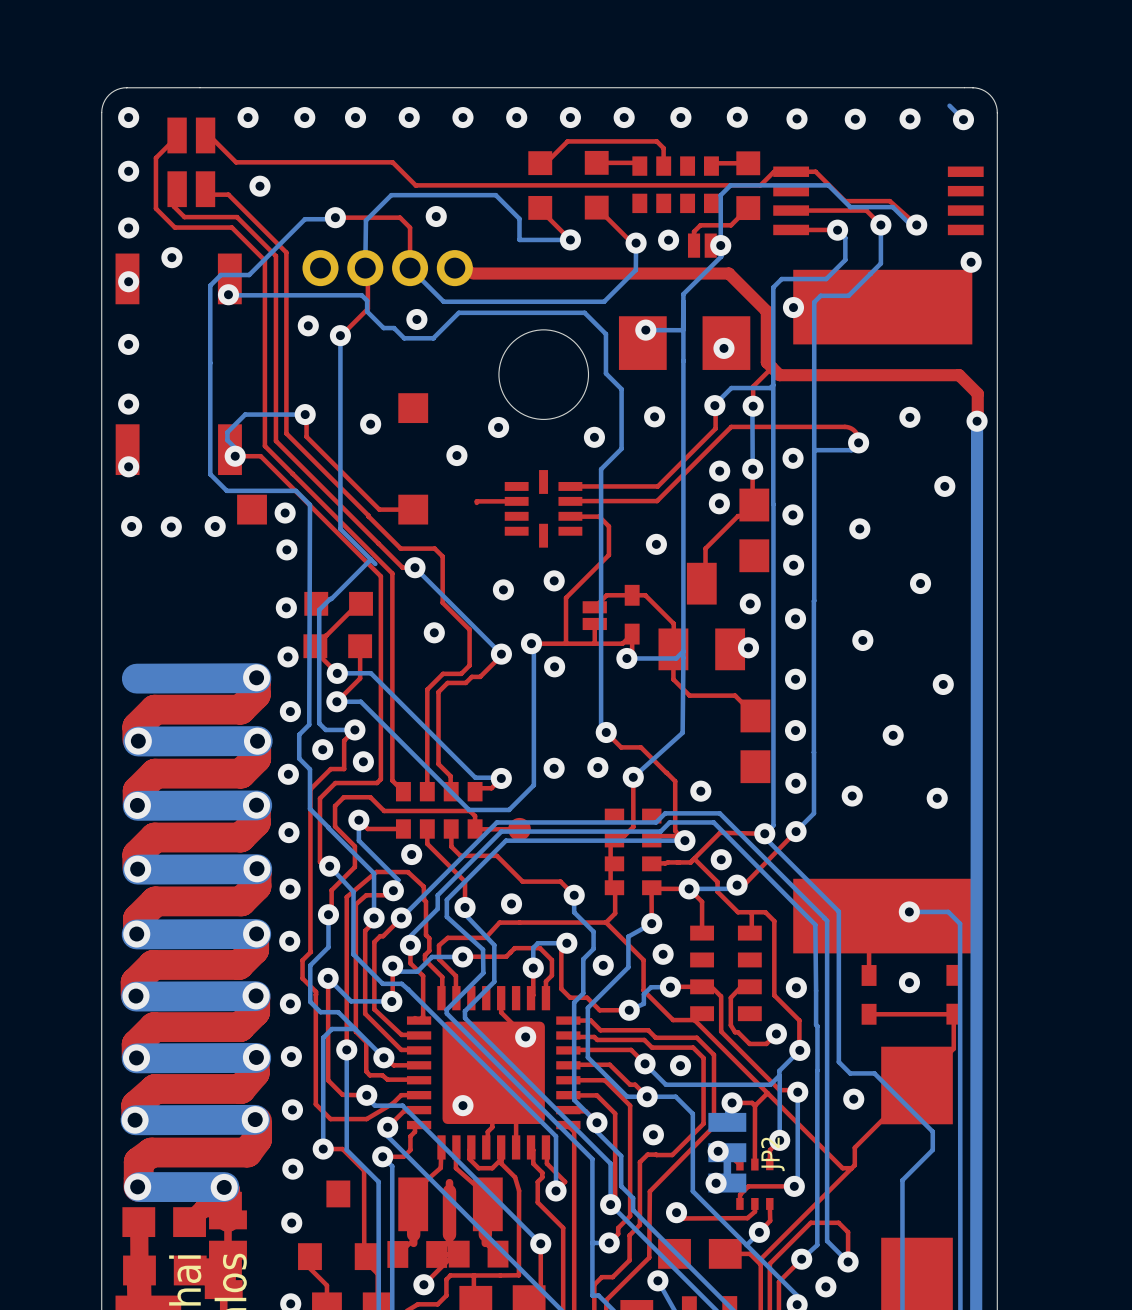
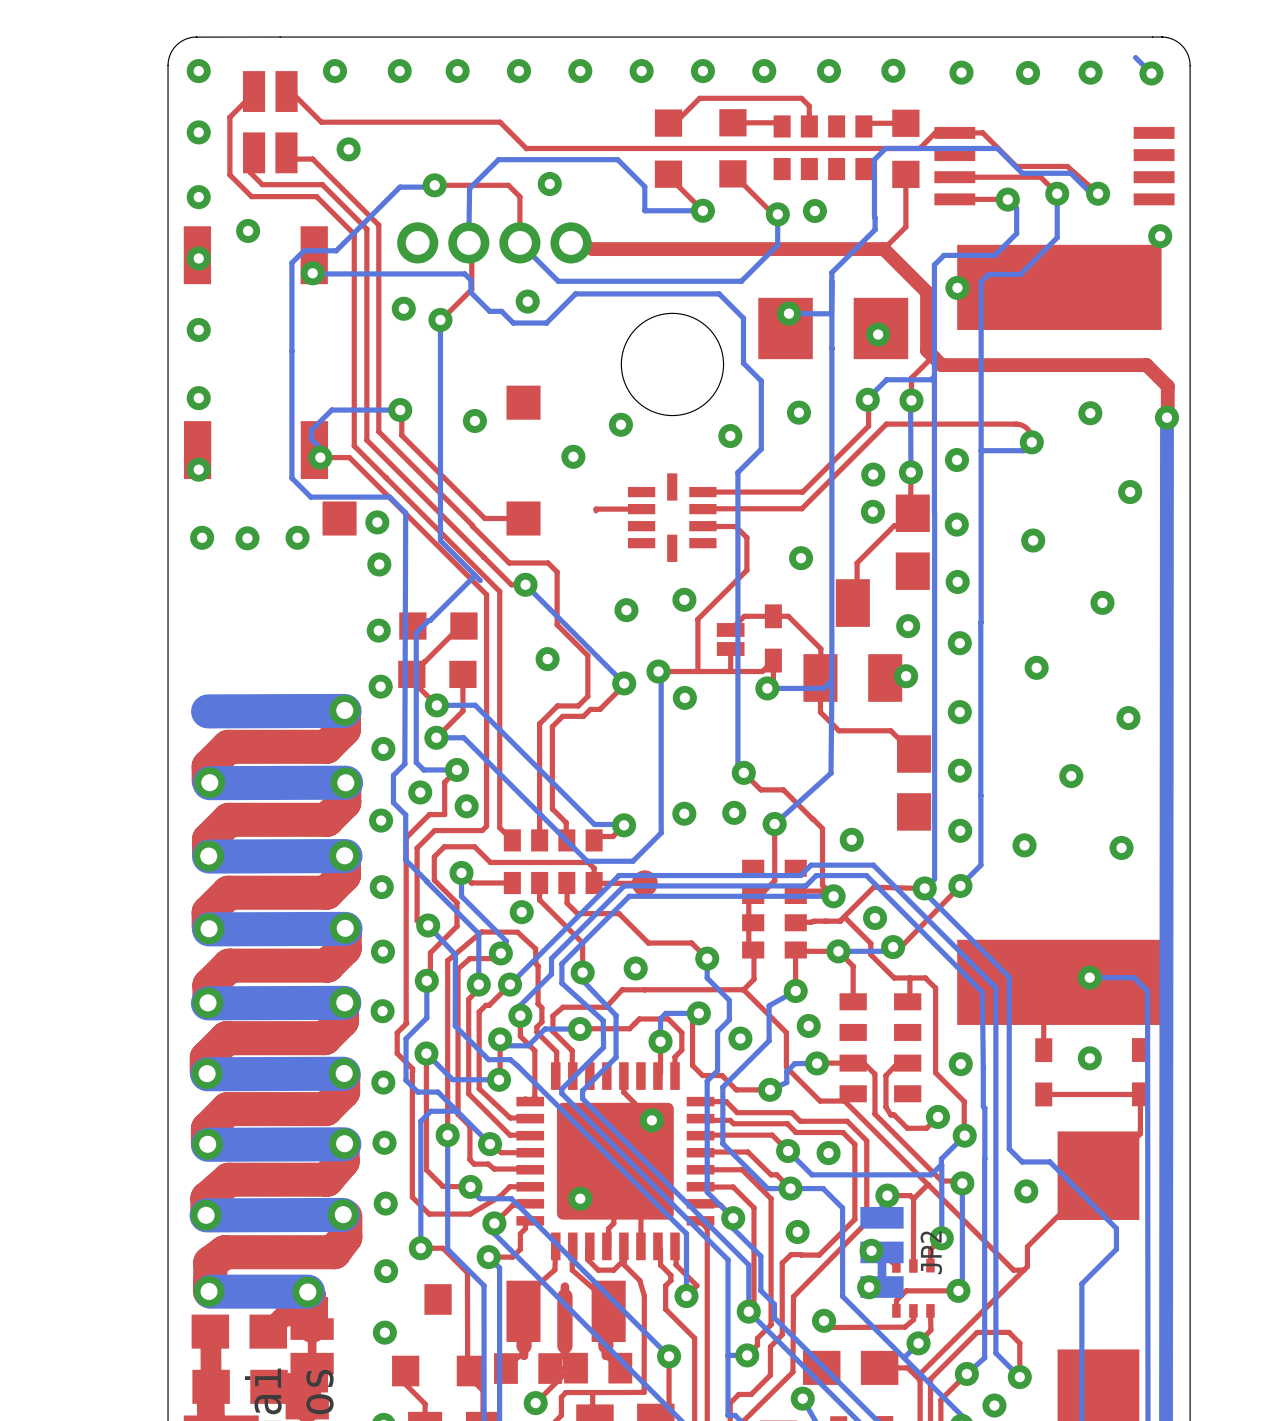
top track: (748, 208) (731, 225) (700, 225) (694, 231) (694, 245) -> (905, 174) (905, 227) (883, 249) (863, 249)
part: (702, 245) -> none
via: (720, 245) -> none

